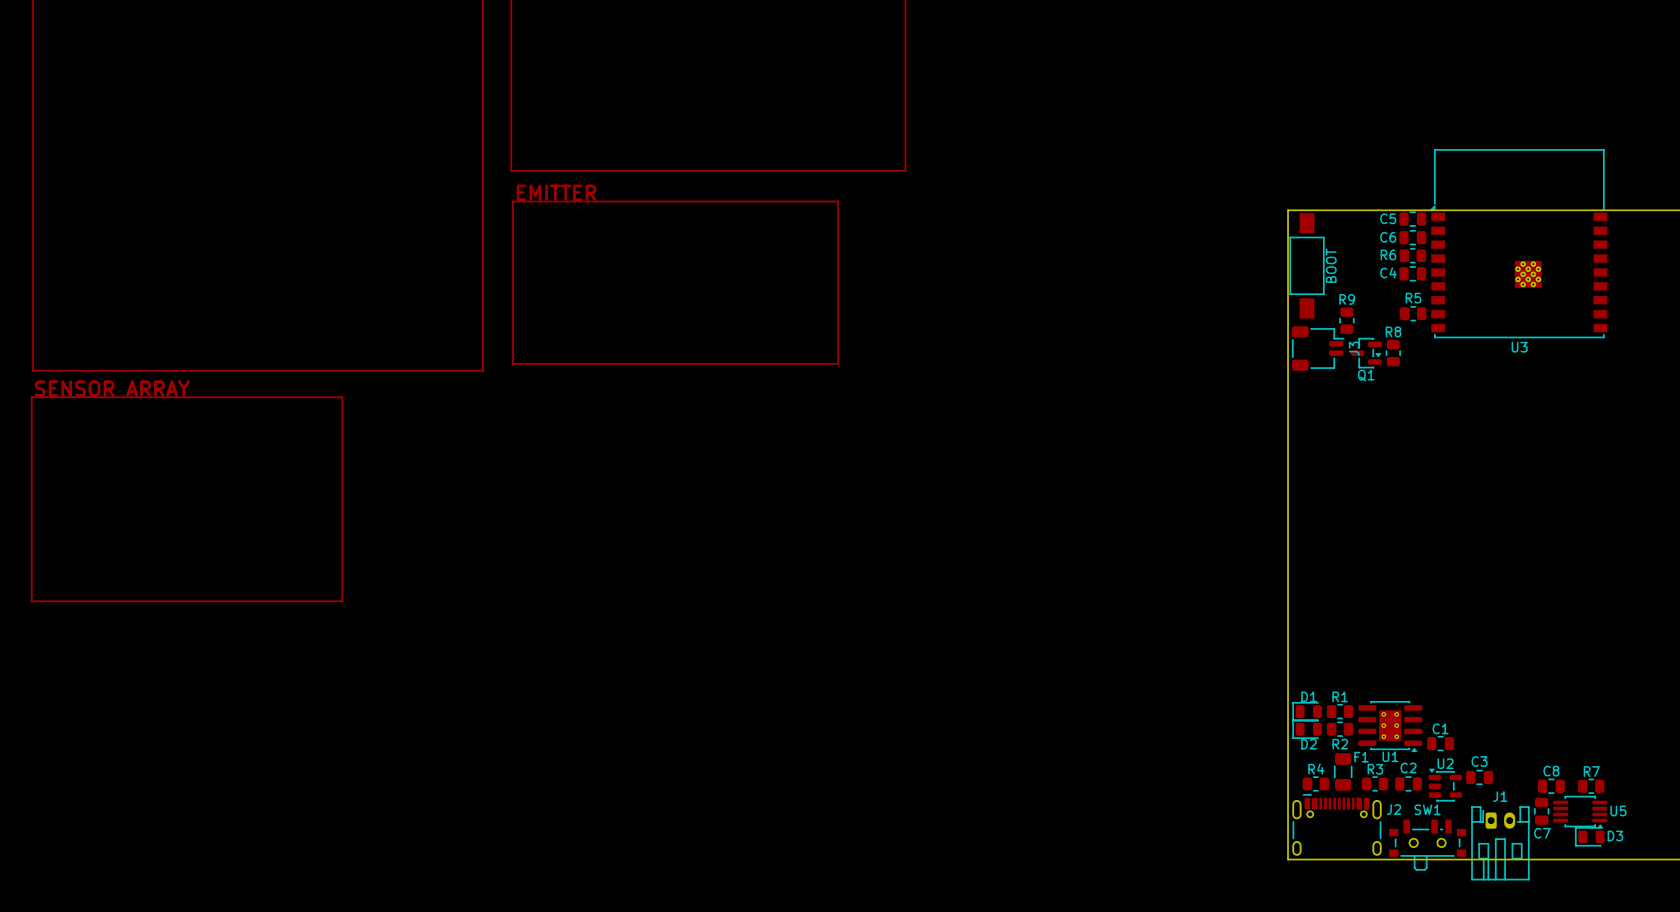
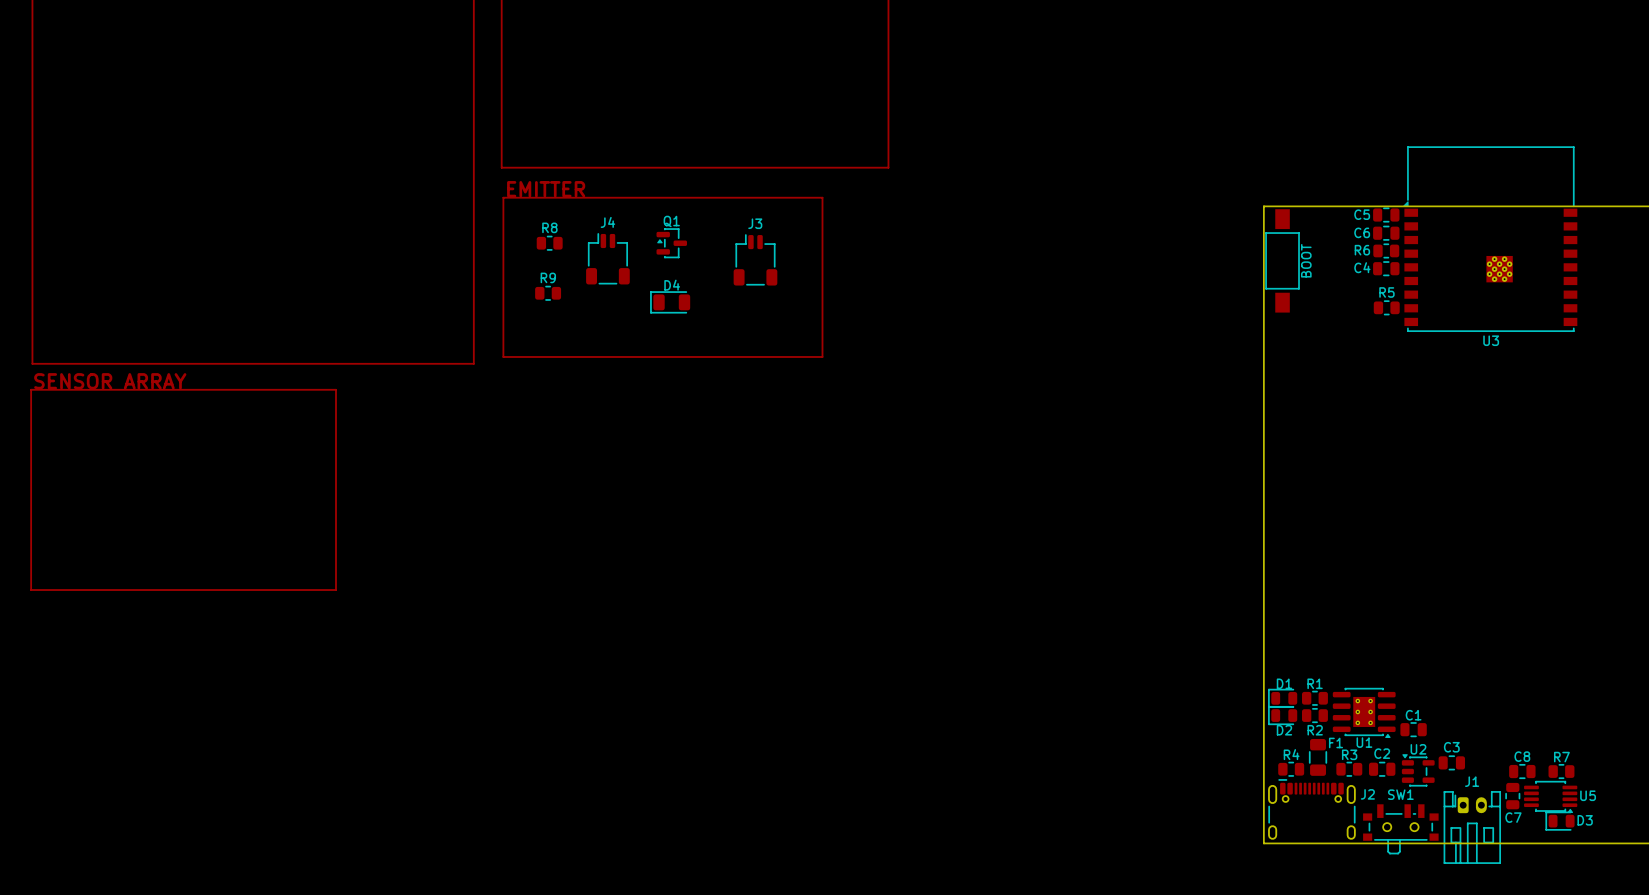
J4: none -> (607, 258)
D4: none -> (670, 302)
R9 rotation: 0° (1346, 320) -> 90° clockwise (548, 293)
R9 position: (1346, 320) -> (548, 293)
J3 rotation: 0° (1317, 348) -> 90° counterclockwise (755, 260)
J3 position: (1317, 348) -> (755, 260)
Q1 rotation: 0° (1366, 353) -> 180° (671, 243)
Q1 position: (1366, 353) -> (671, 243)
R8 rotation: 0° (1393, 353) -> 90° clockwise (549, 243)
R8 position: (1393, 353) -> (549, 243)

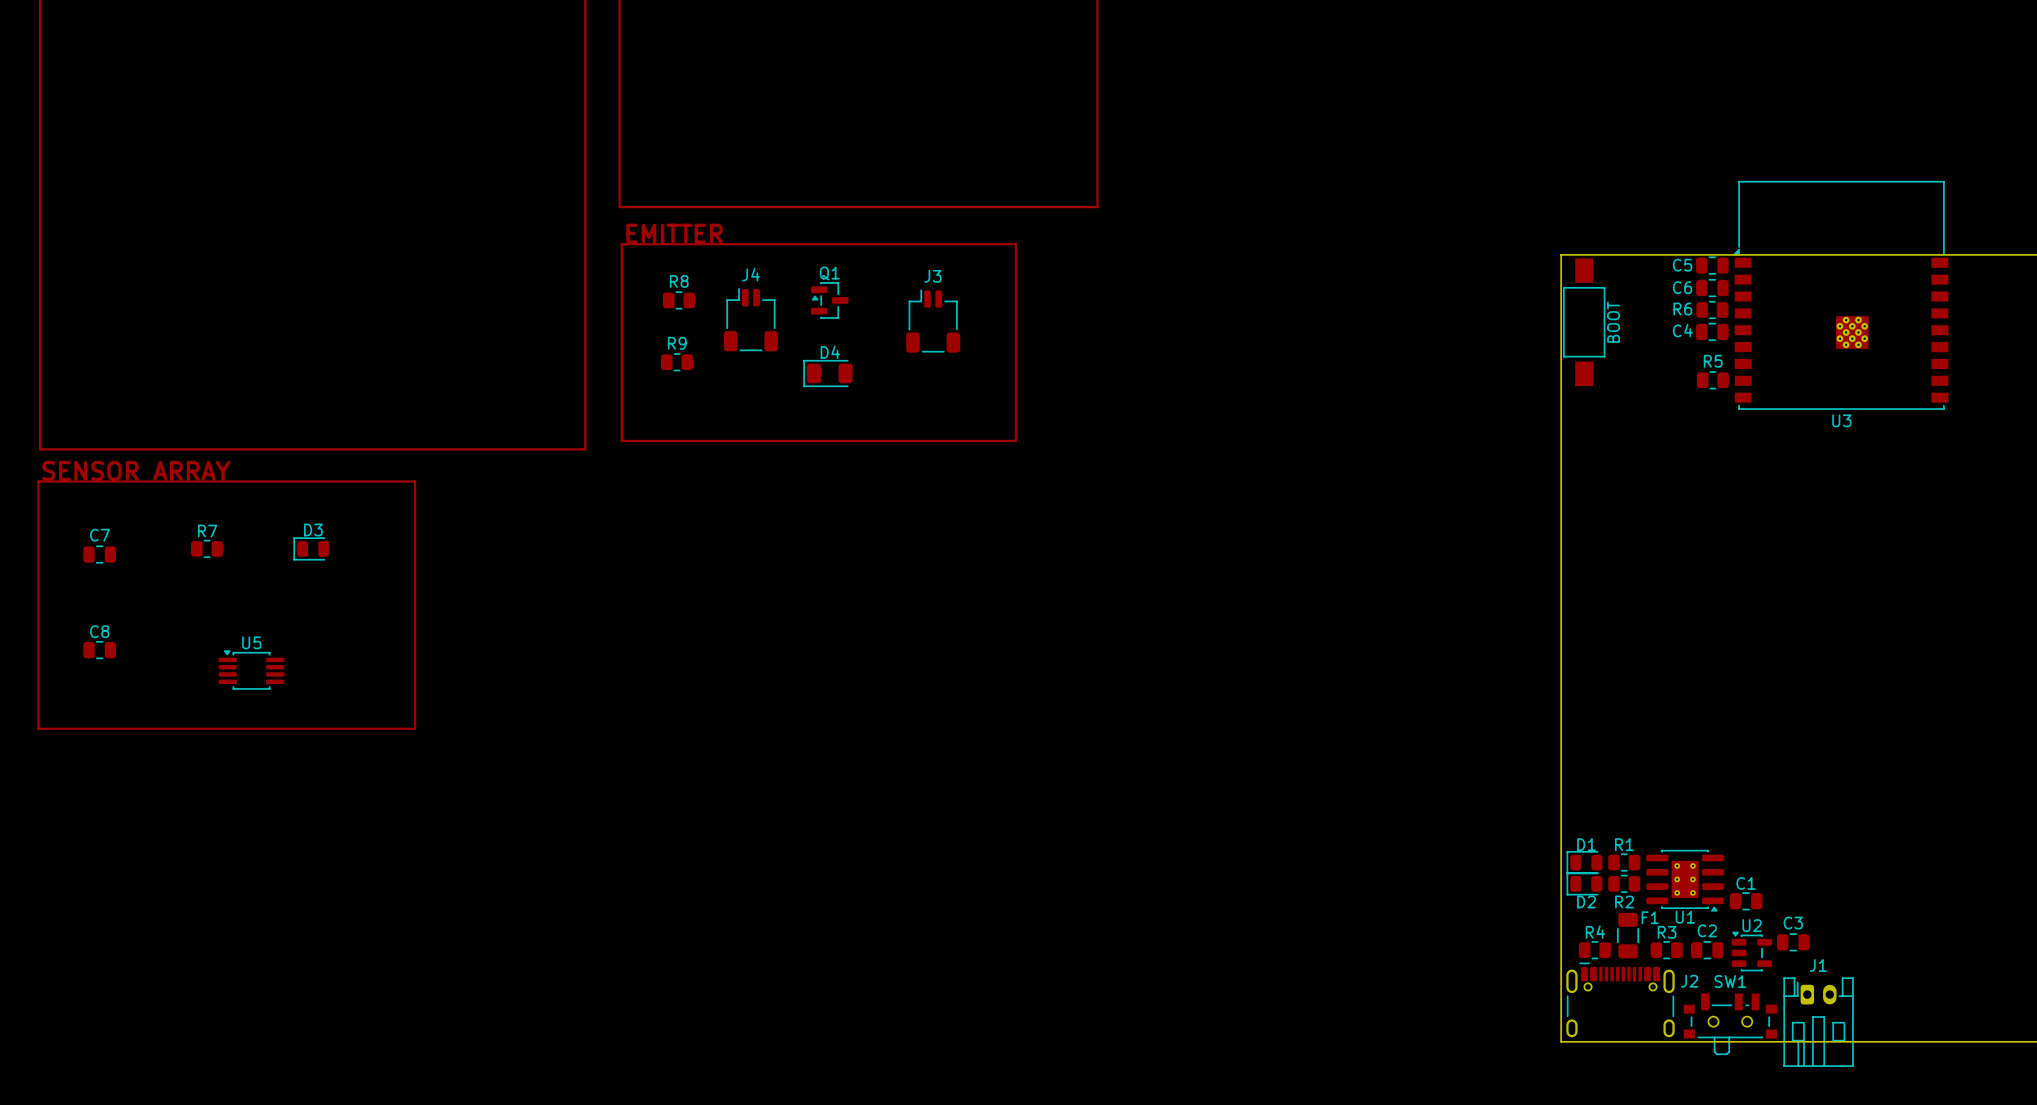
C8 position: (1522, 771) -> (99, 650)
R7 position: (1561, 771) -> (207, 548)
U5 name position: U5 (1588, 795) -> U5 (251, 642)
C7 rotation: 0° (1512, 796) -> 90° clockwise (99, 554)
C7 position: (1512, 796) -> (99, 554)
U5 rotation: 0° (1550, 797) -> 180° (251, 669)
U5 position: (1550, 797) -> (251, 669)
C7 name position: C7 (1513, 817) -> C7 (99, 535)
D3 name position: D3 (1585, 820) -> D3 (313, 529)
D3 position: (1560, 821) -> (311, 548)

